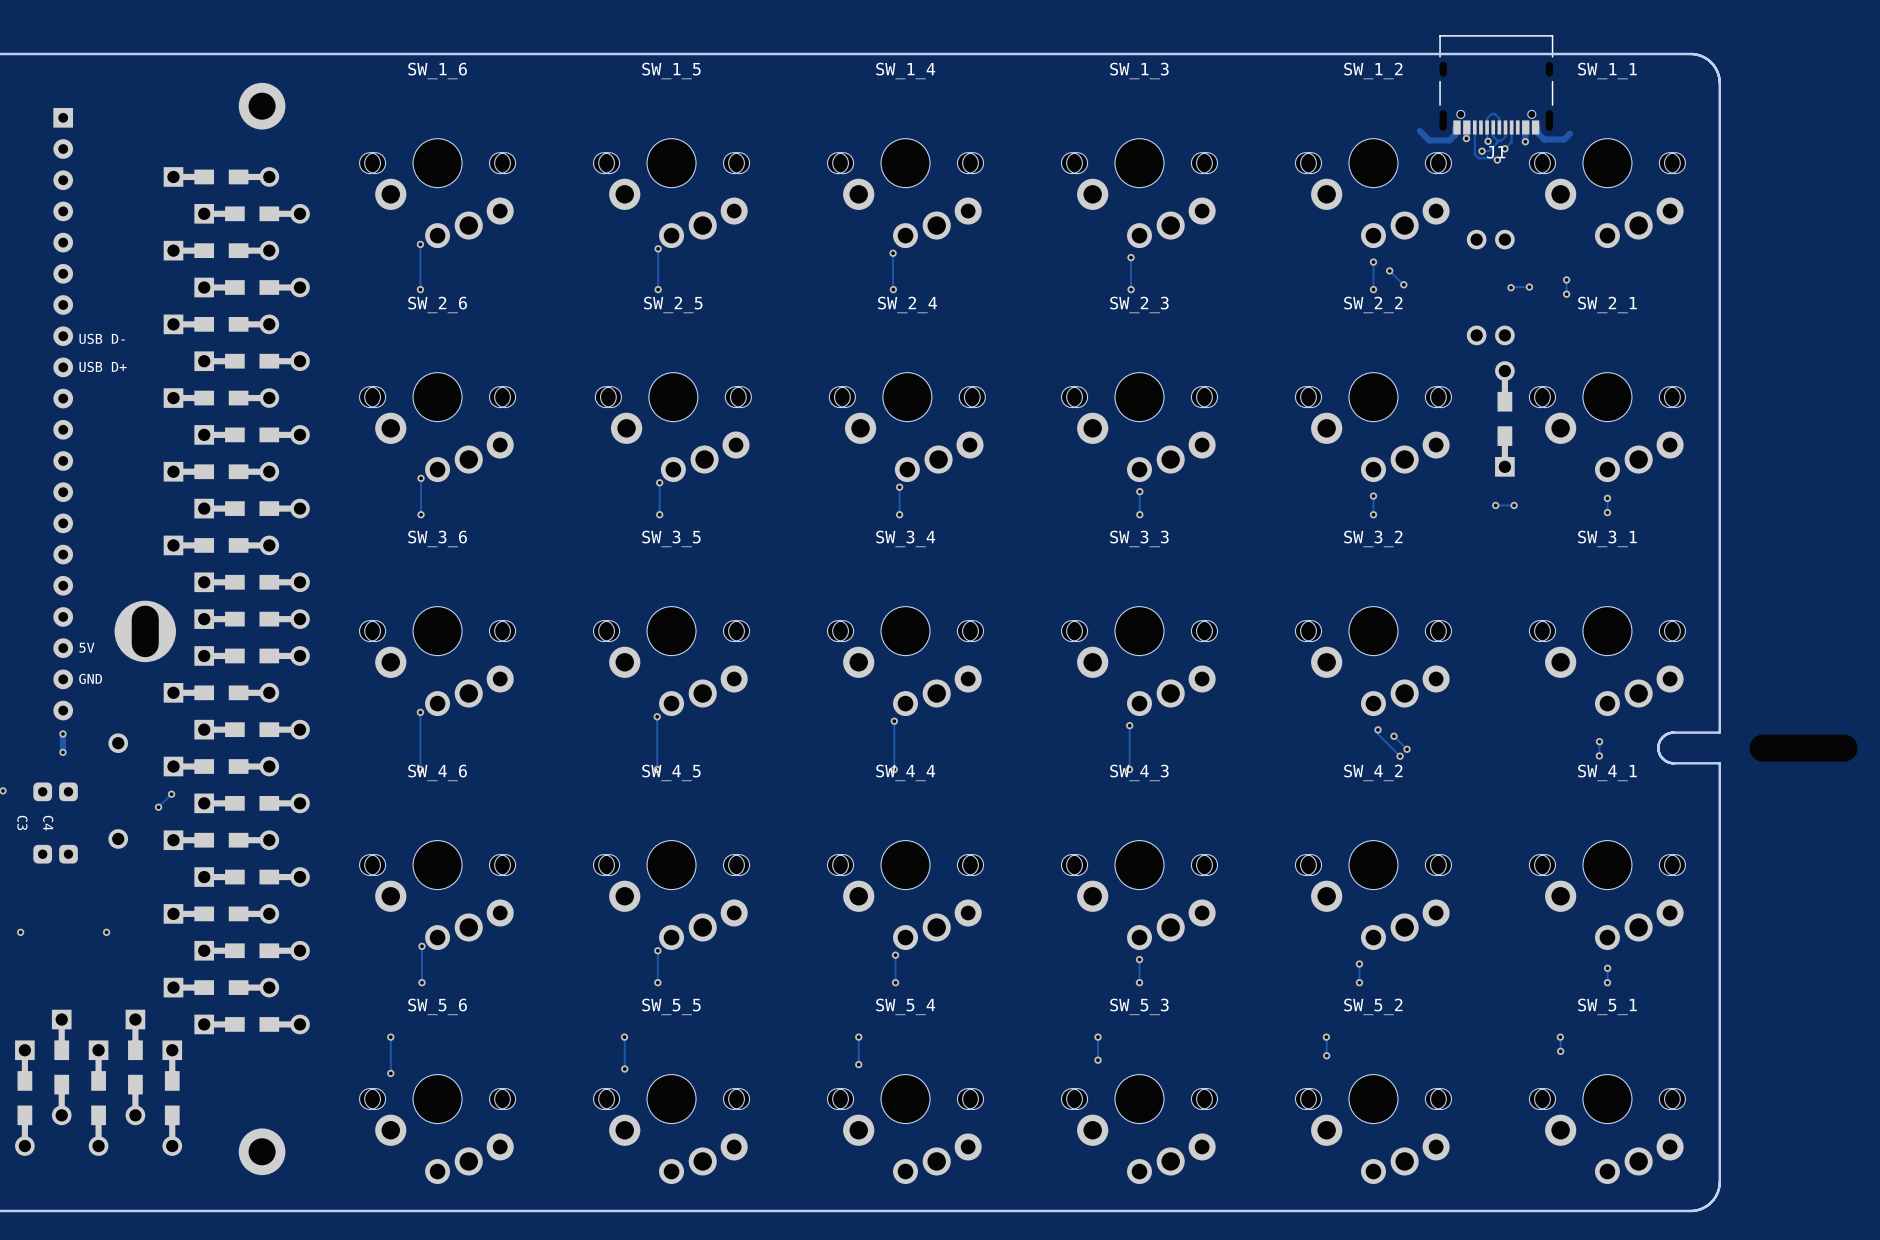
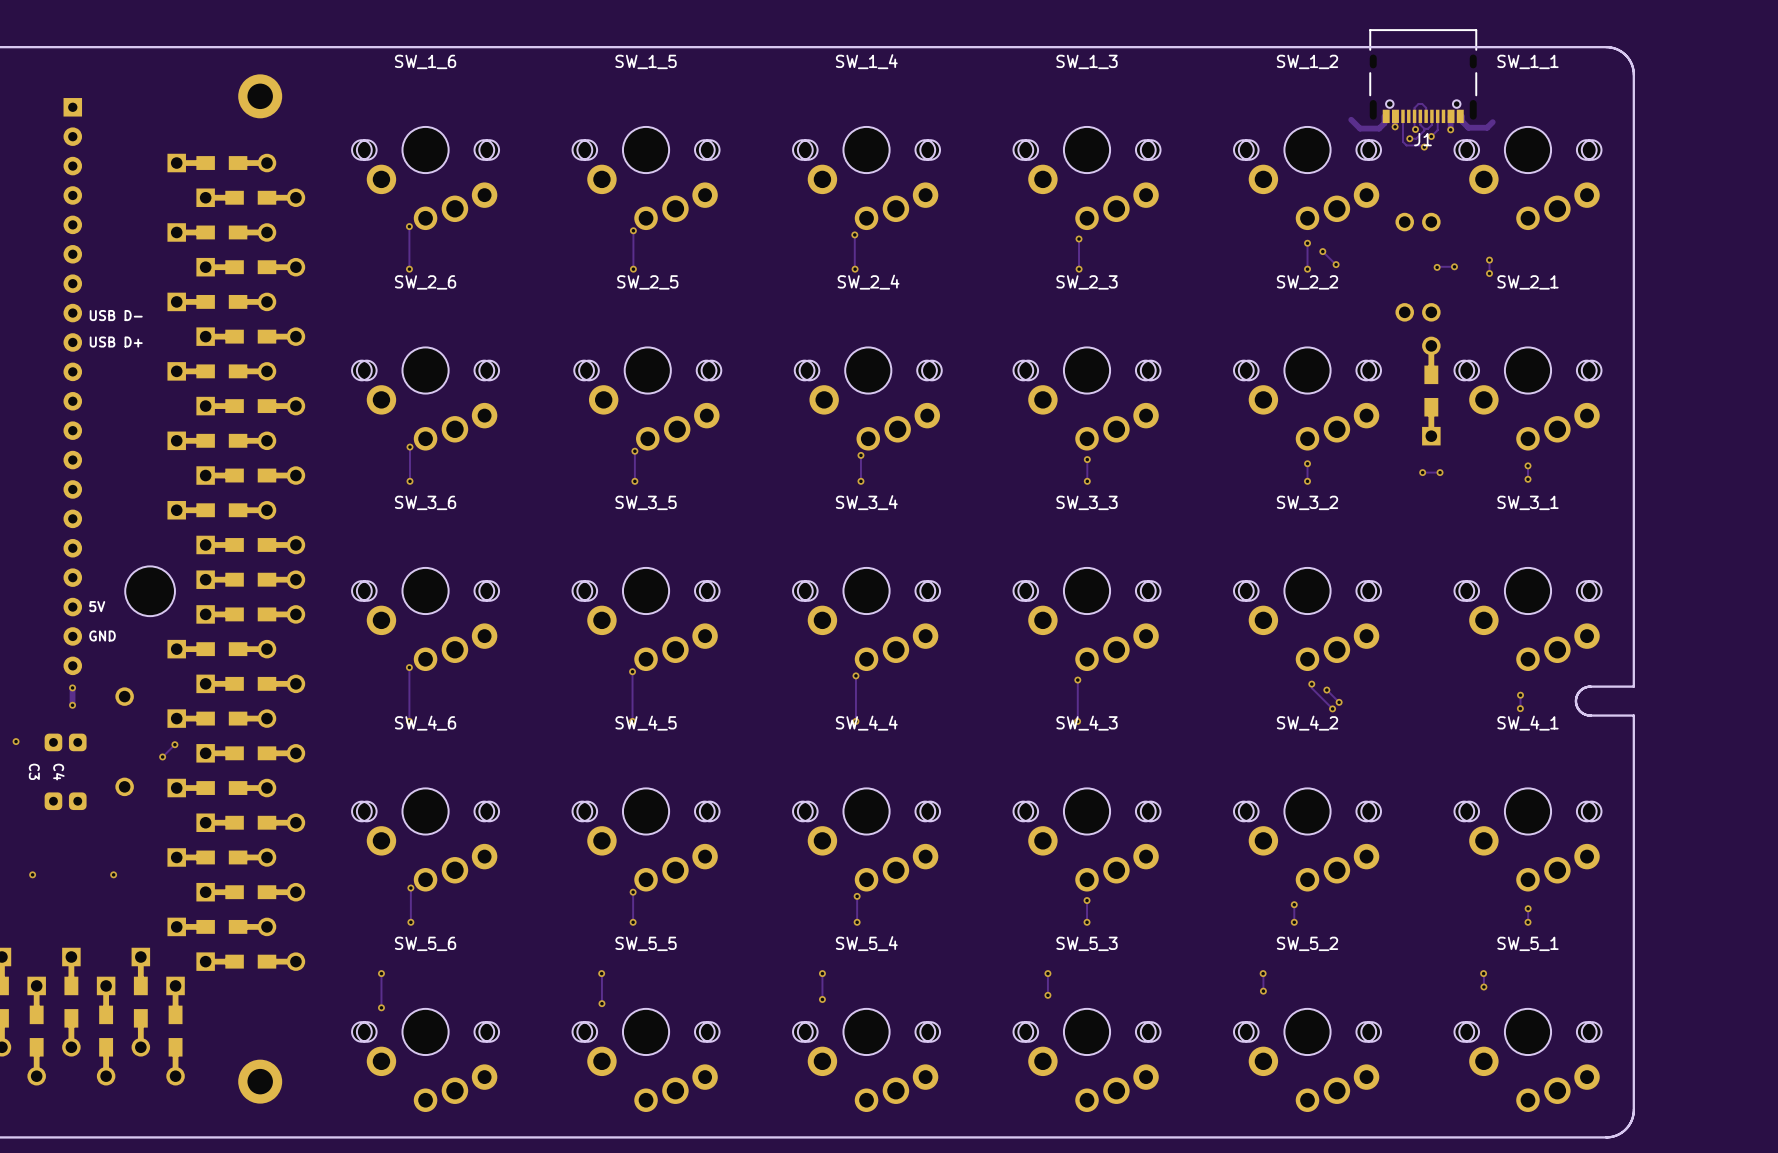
part footprint: [114, 600, 176, 663] -> [125, 566, 175, 617]
part: (1803, 748) -> none

